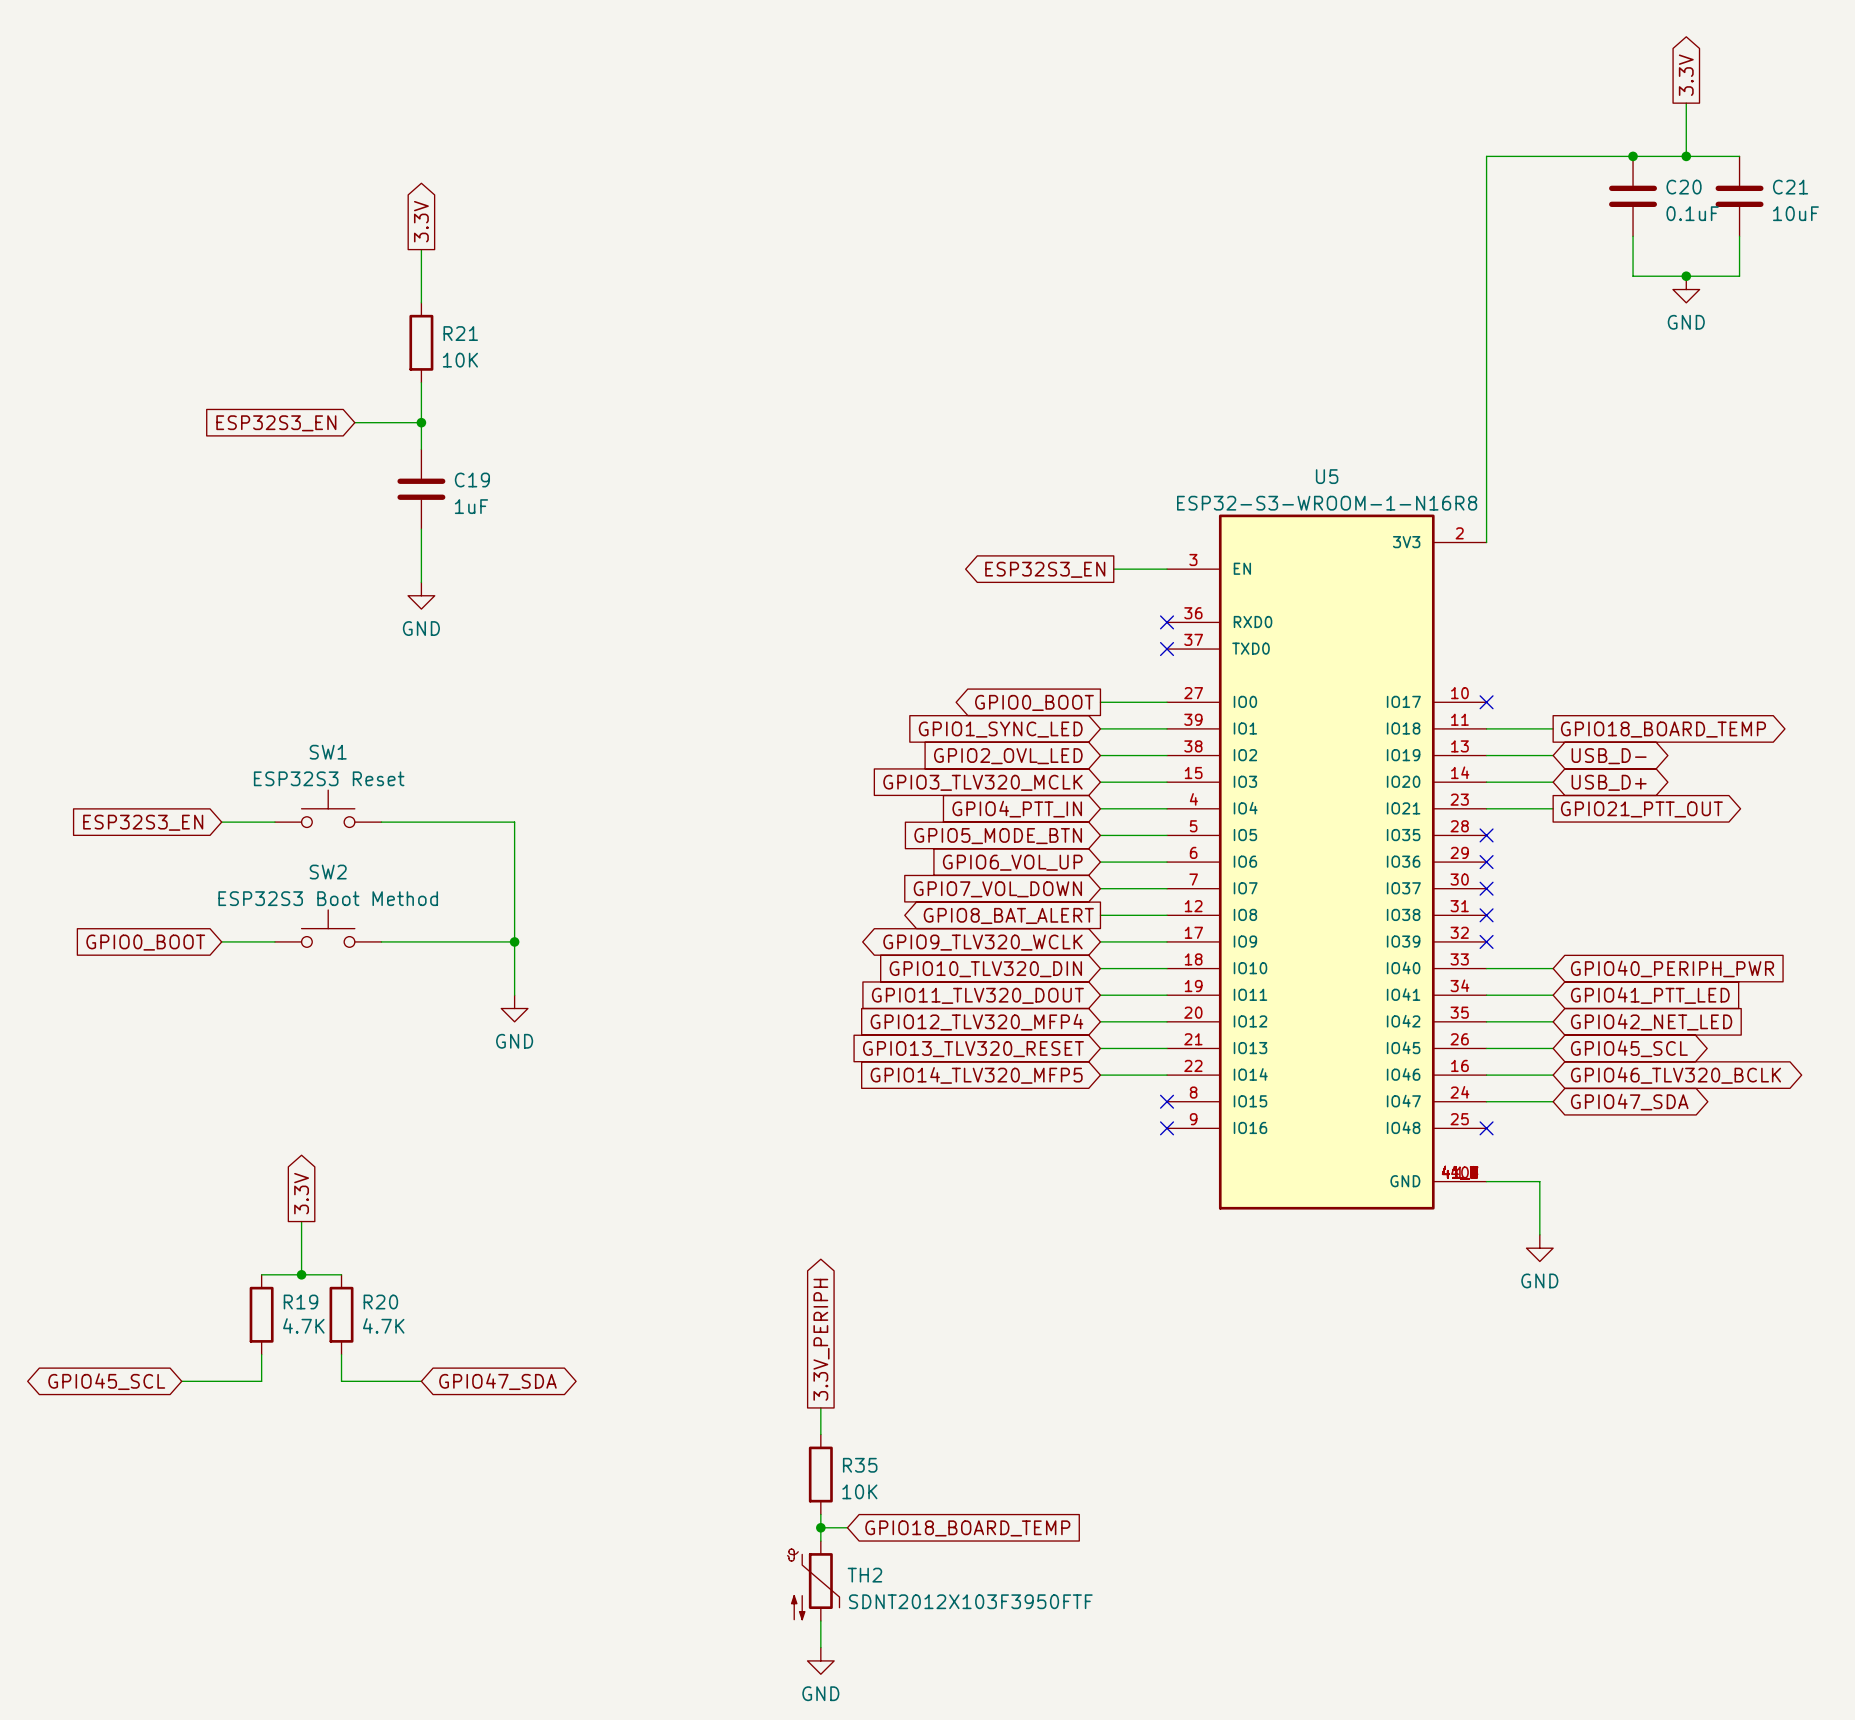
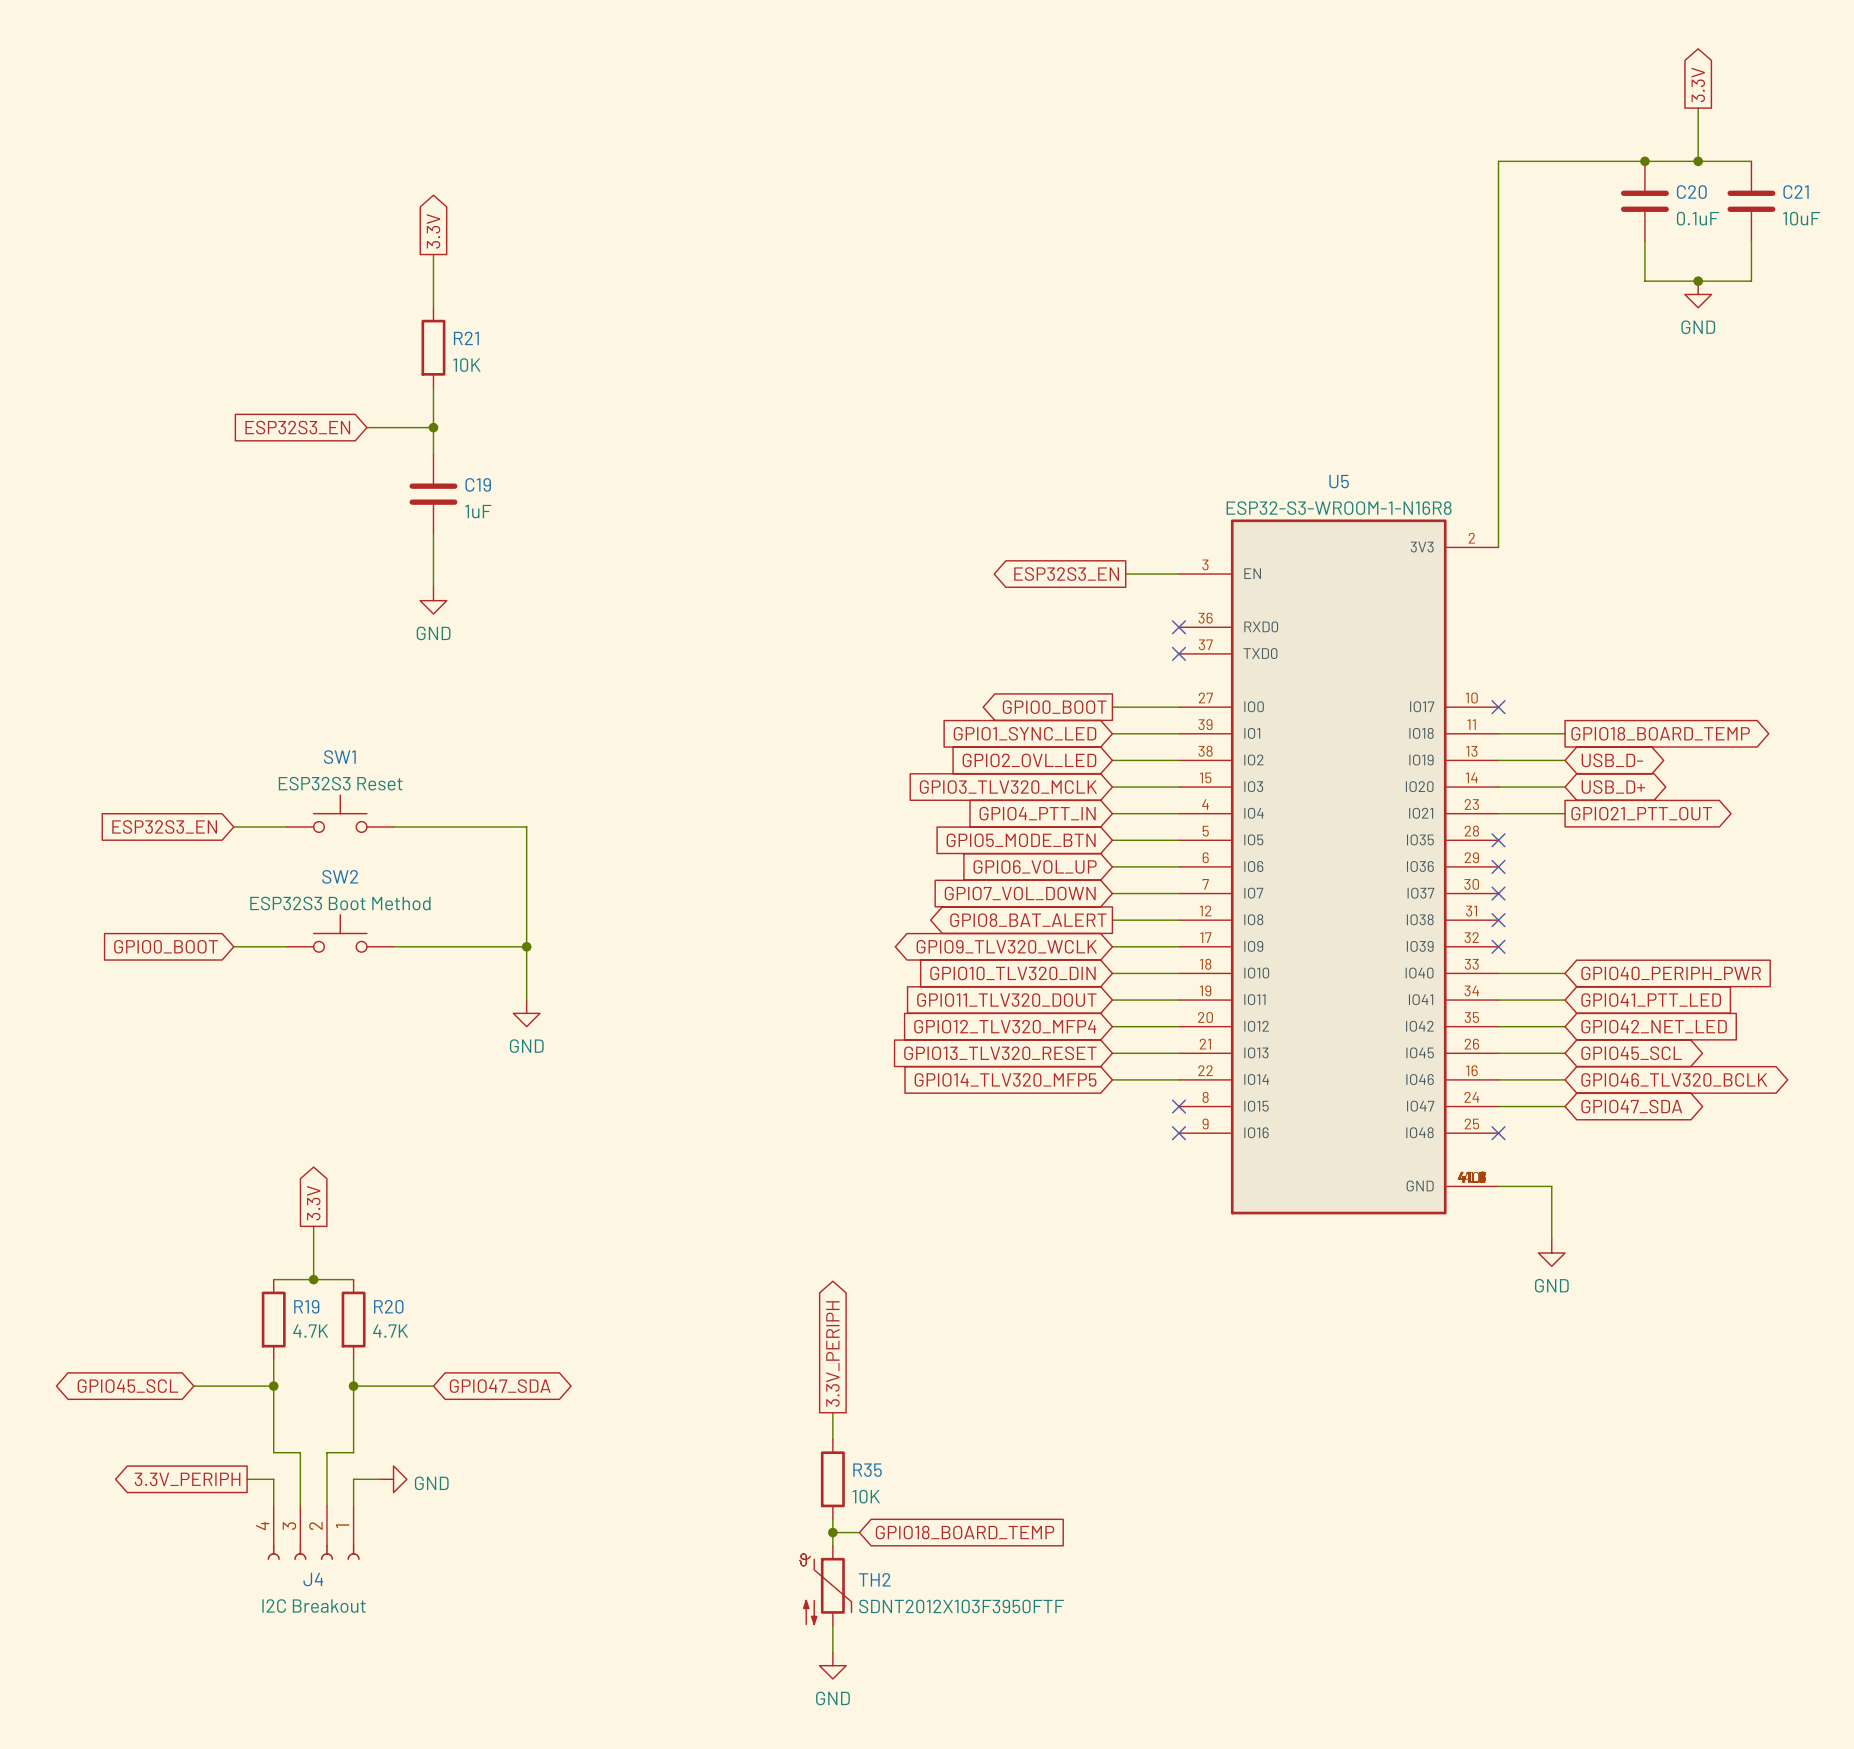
wire: none -> (273, 1386) (273, 1452) (300, 1452) (300, 1505)
junction: none -> (273, 1386)
wire: none -> (353, 1386) (353, 1452) (326, 1452) (326, 1505)
junction: none -> (353, 1386)
wire: none -> (247, 1479) (273, 1479) (273, 1505)
wire: none -> (380, 1479) (353, 1479) (353, 1505)
power symbol: none -> GND (393, 1479)
global label: none -> 3.3V_PERIPH (187, 1479)
J4: none -> I2C Breakout (313, 1532)

